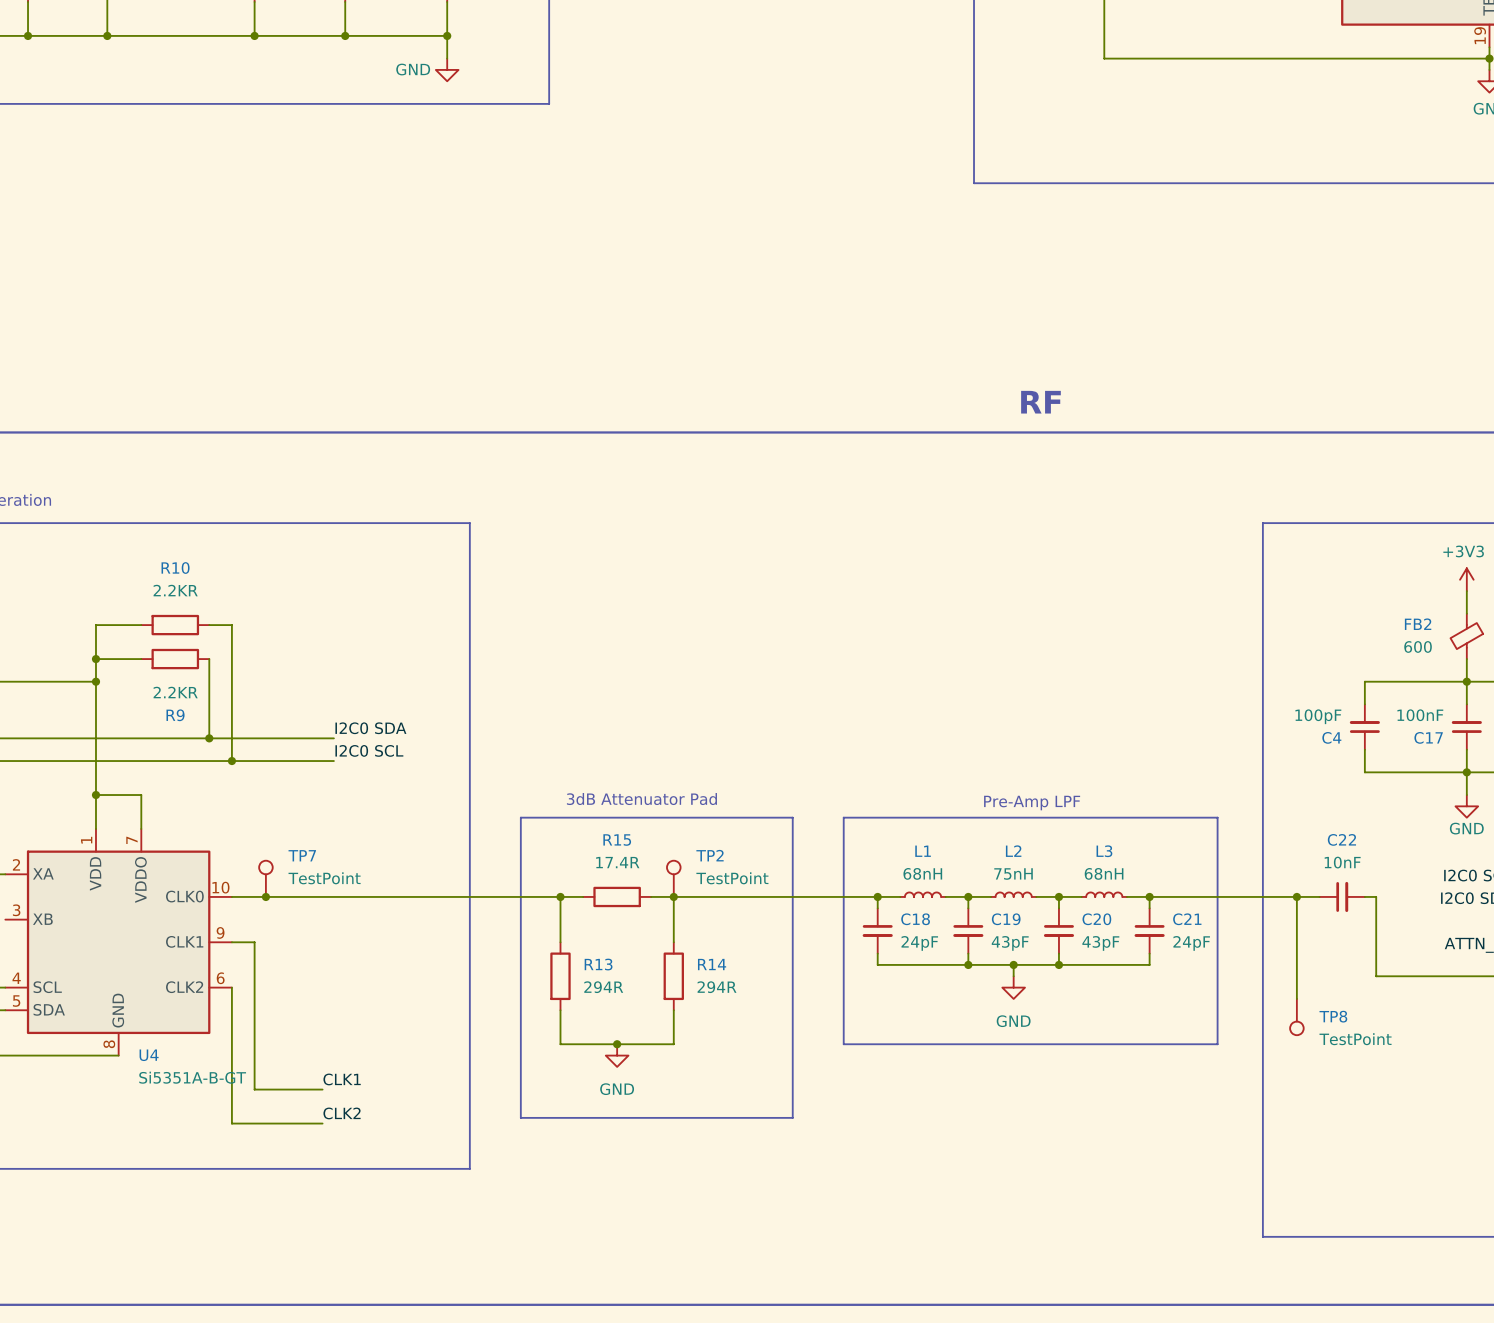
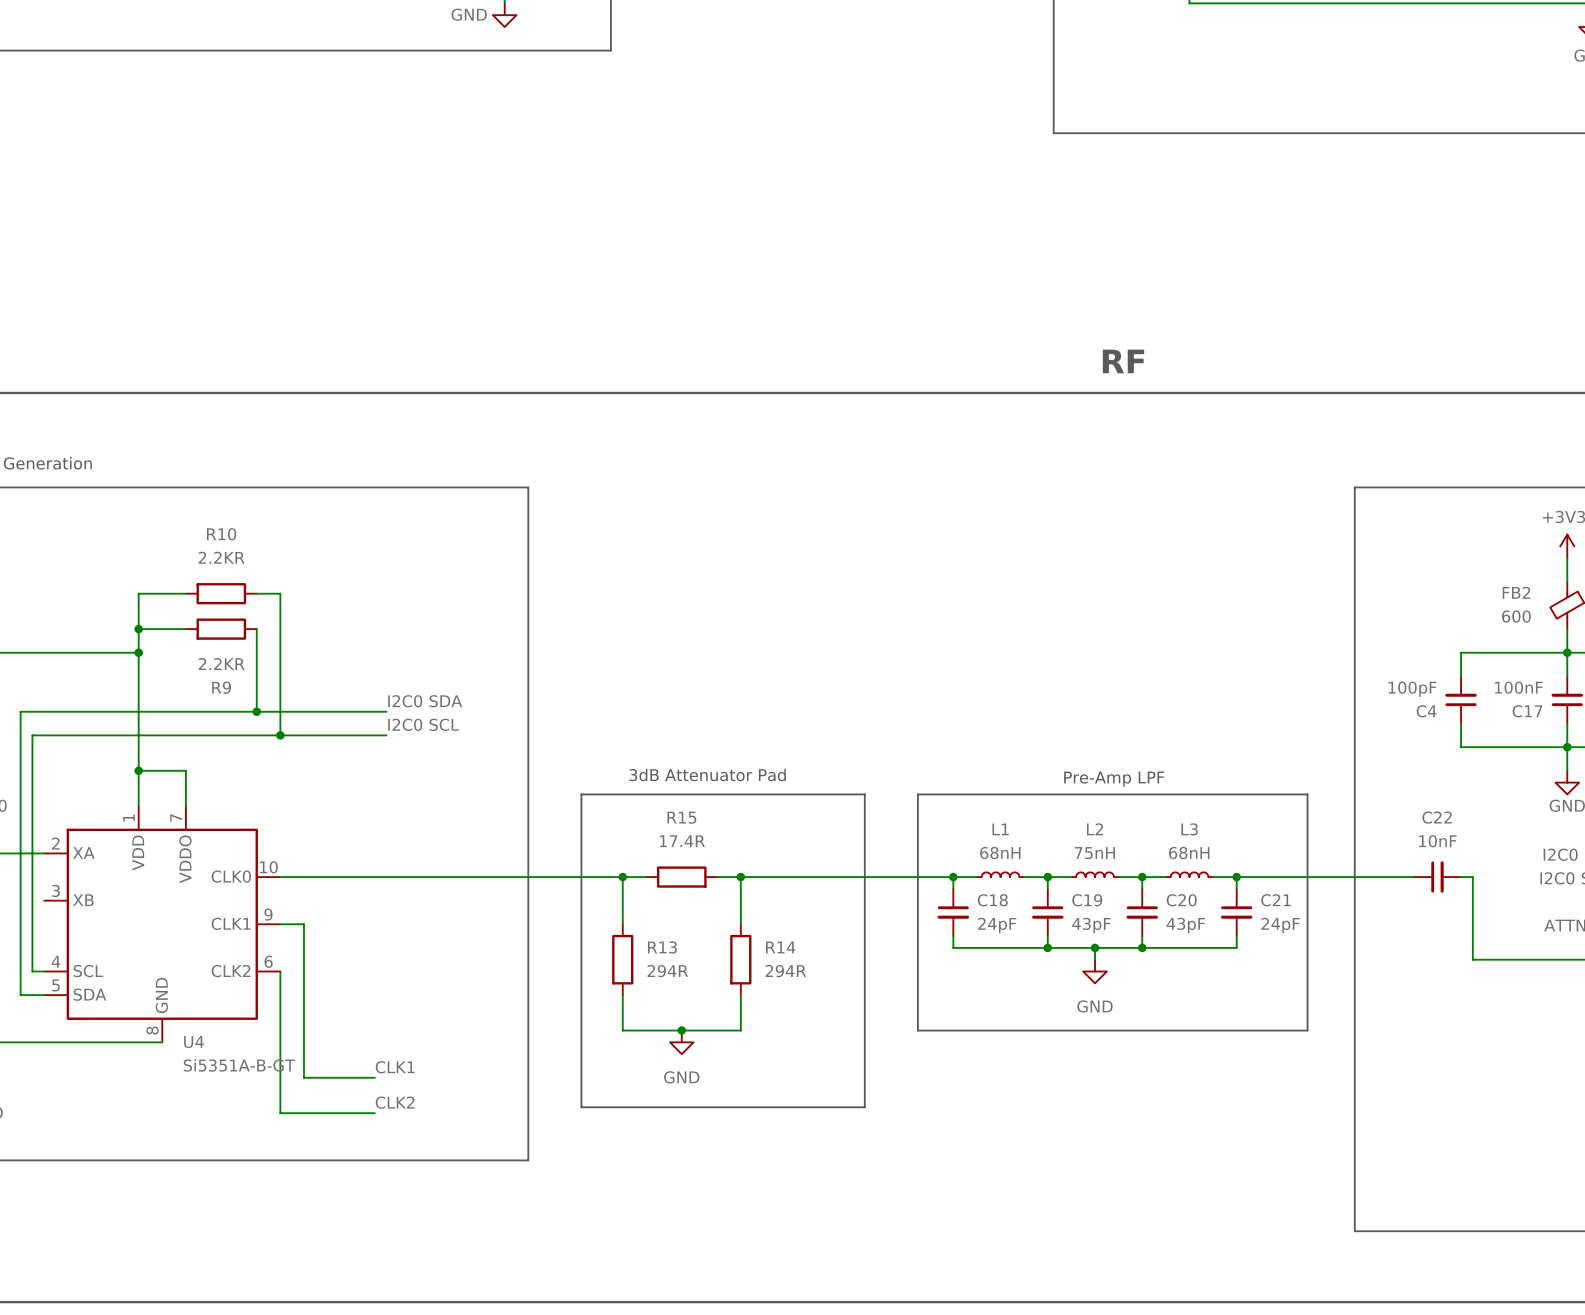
TP7: TestPoint (265, 878) -> none
TP2: TestPoint (673, 878) -> none
junction: (265, 896) -> none
wire: (1296, 896) (1296, 998) -> none
junction: (1296, 896) -> none
TP8: TestPoint (1296, 1017) -> none

